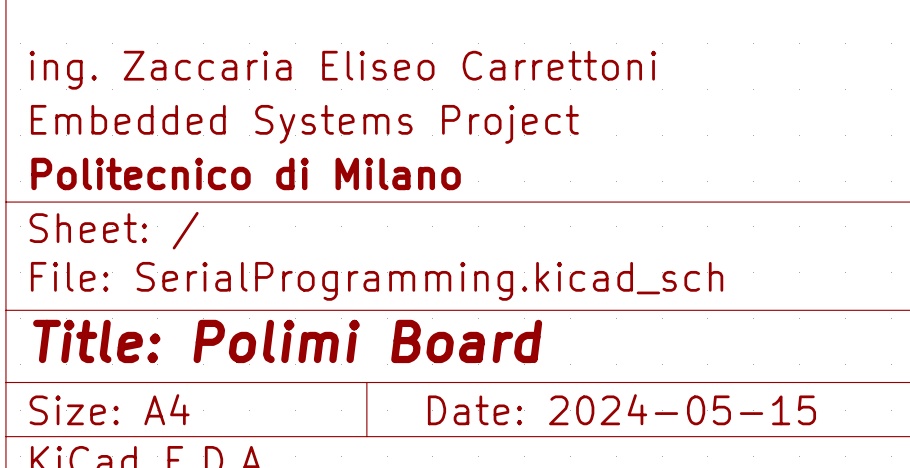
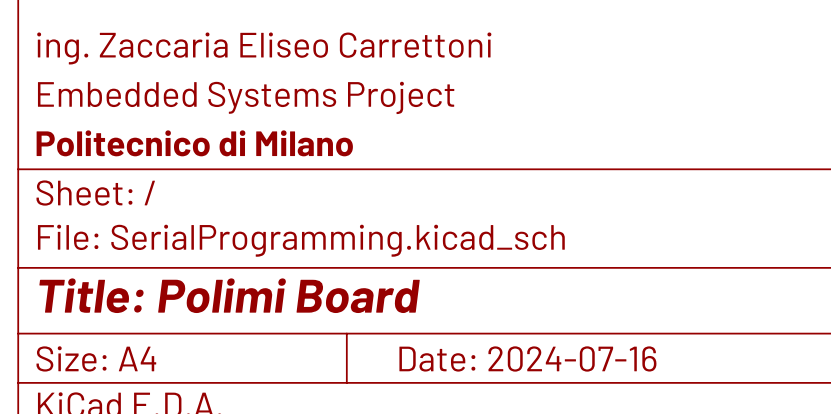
title block: Date: 2024-05-15 (621, 409) -> Date: 2024-07-16 (527, 358)

